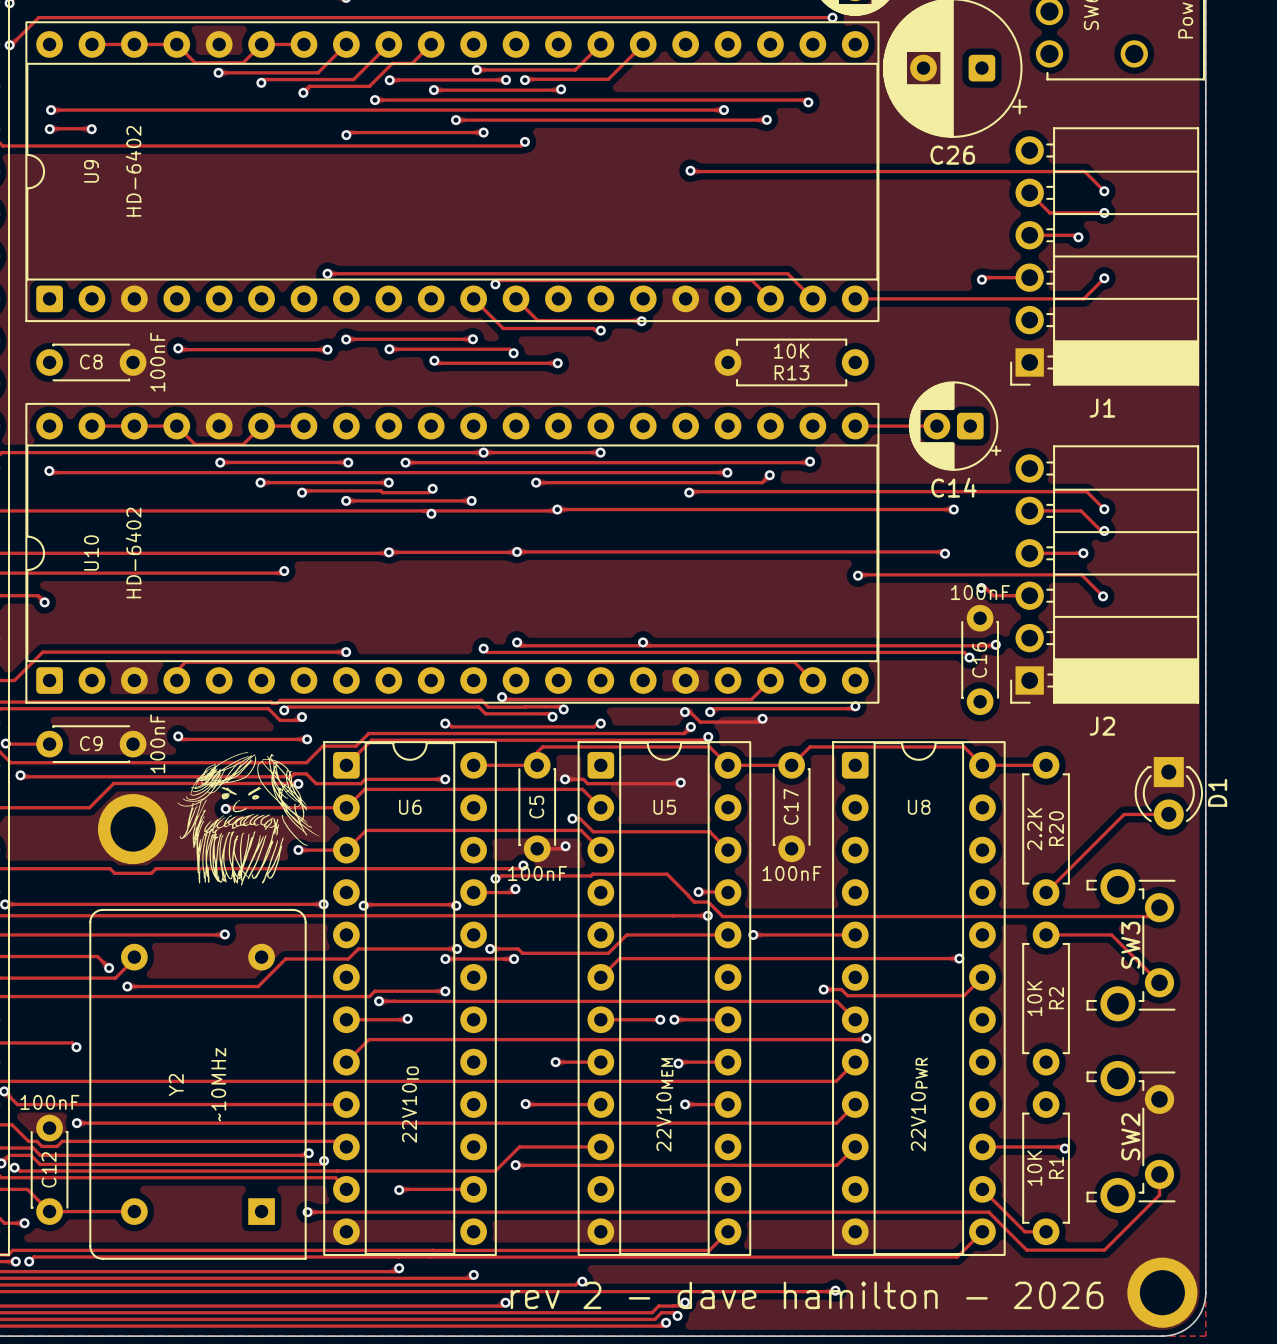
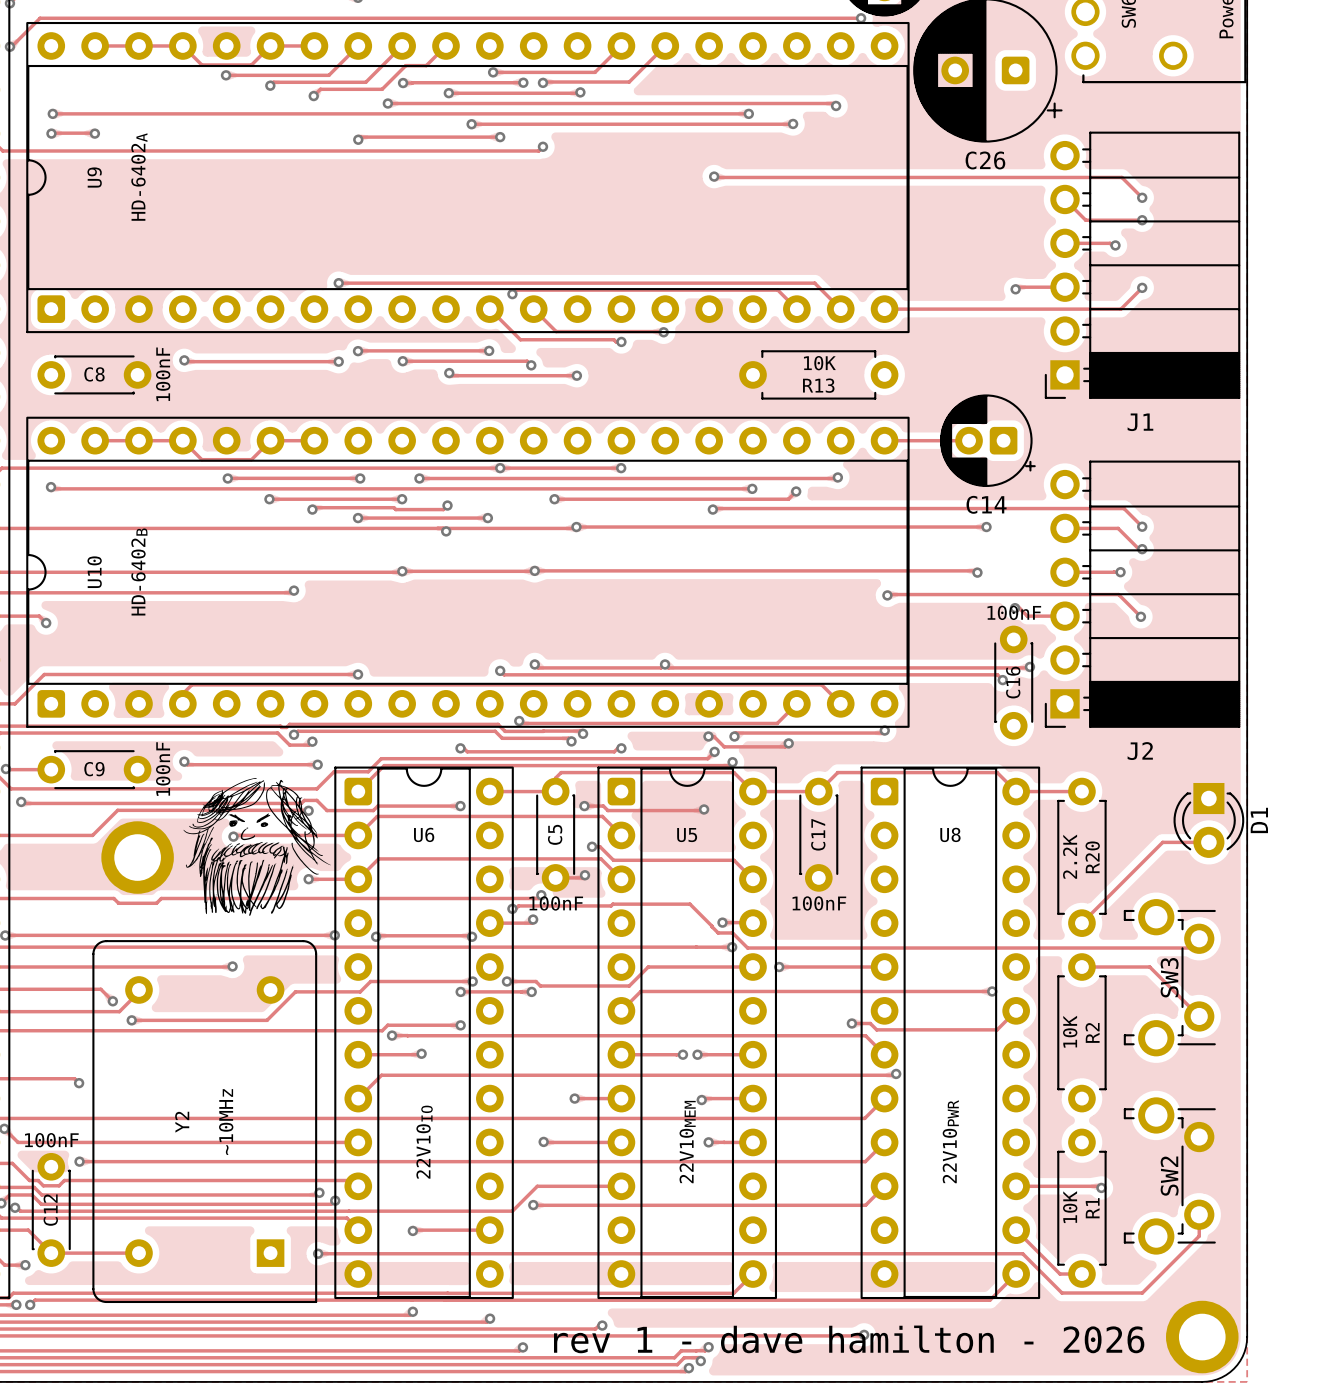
U9 value: HD-6402 (133, 171) -> HD-6402A (139, 177)
U10 value: HD-6402 (133, 552) -> HD-6402B (139, 572)
text: rev 2 - dave hamilton - 2026 (807, 1295) -> rev 1 - dave hamilton - 2026 (849, 1339)

